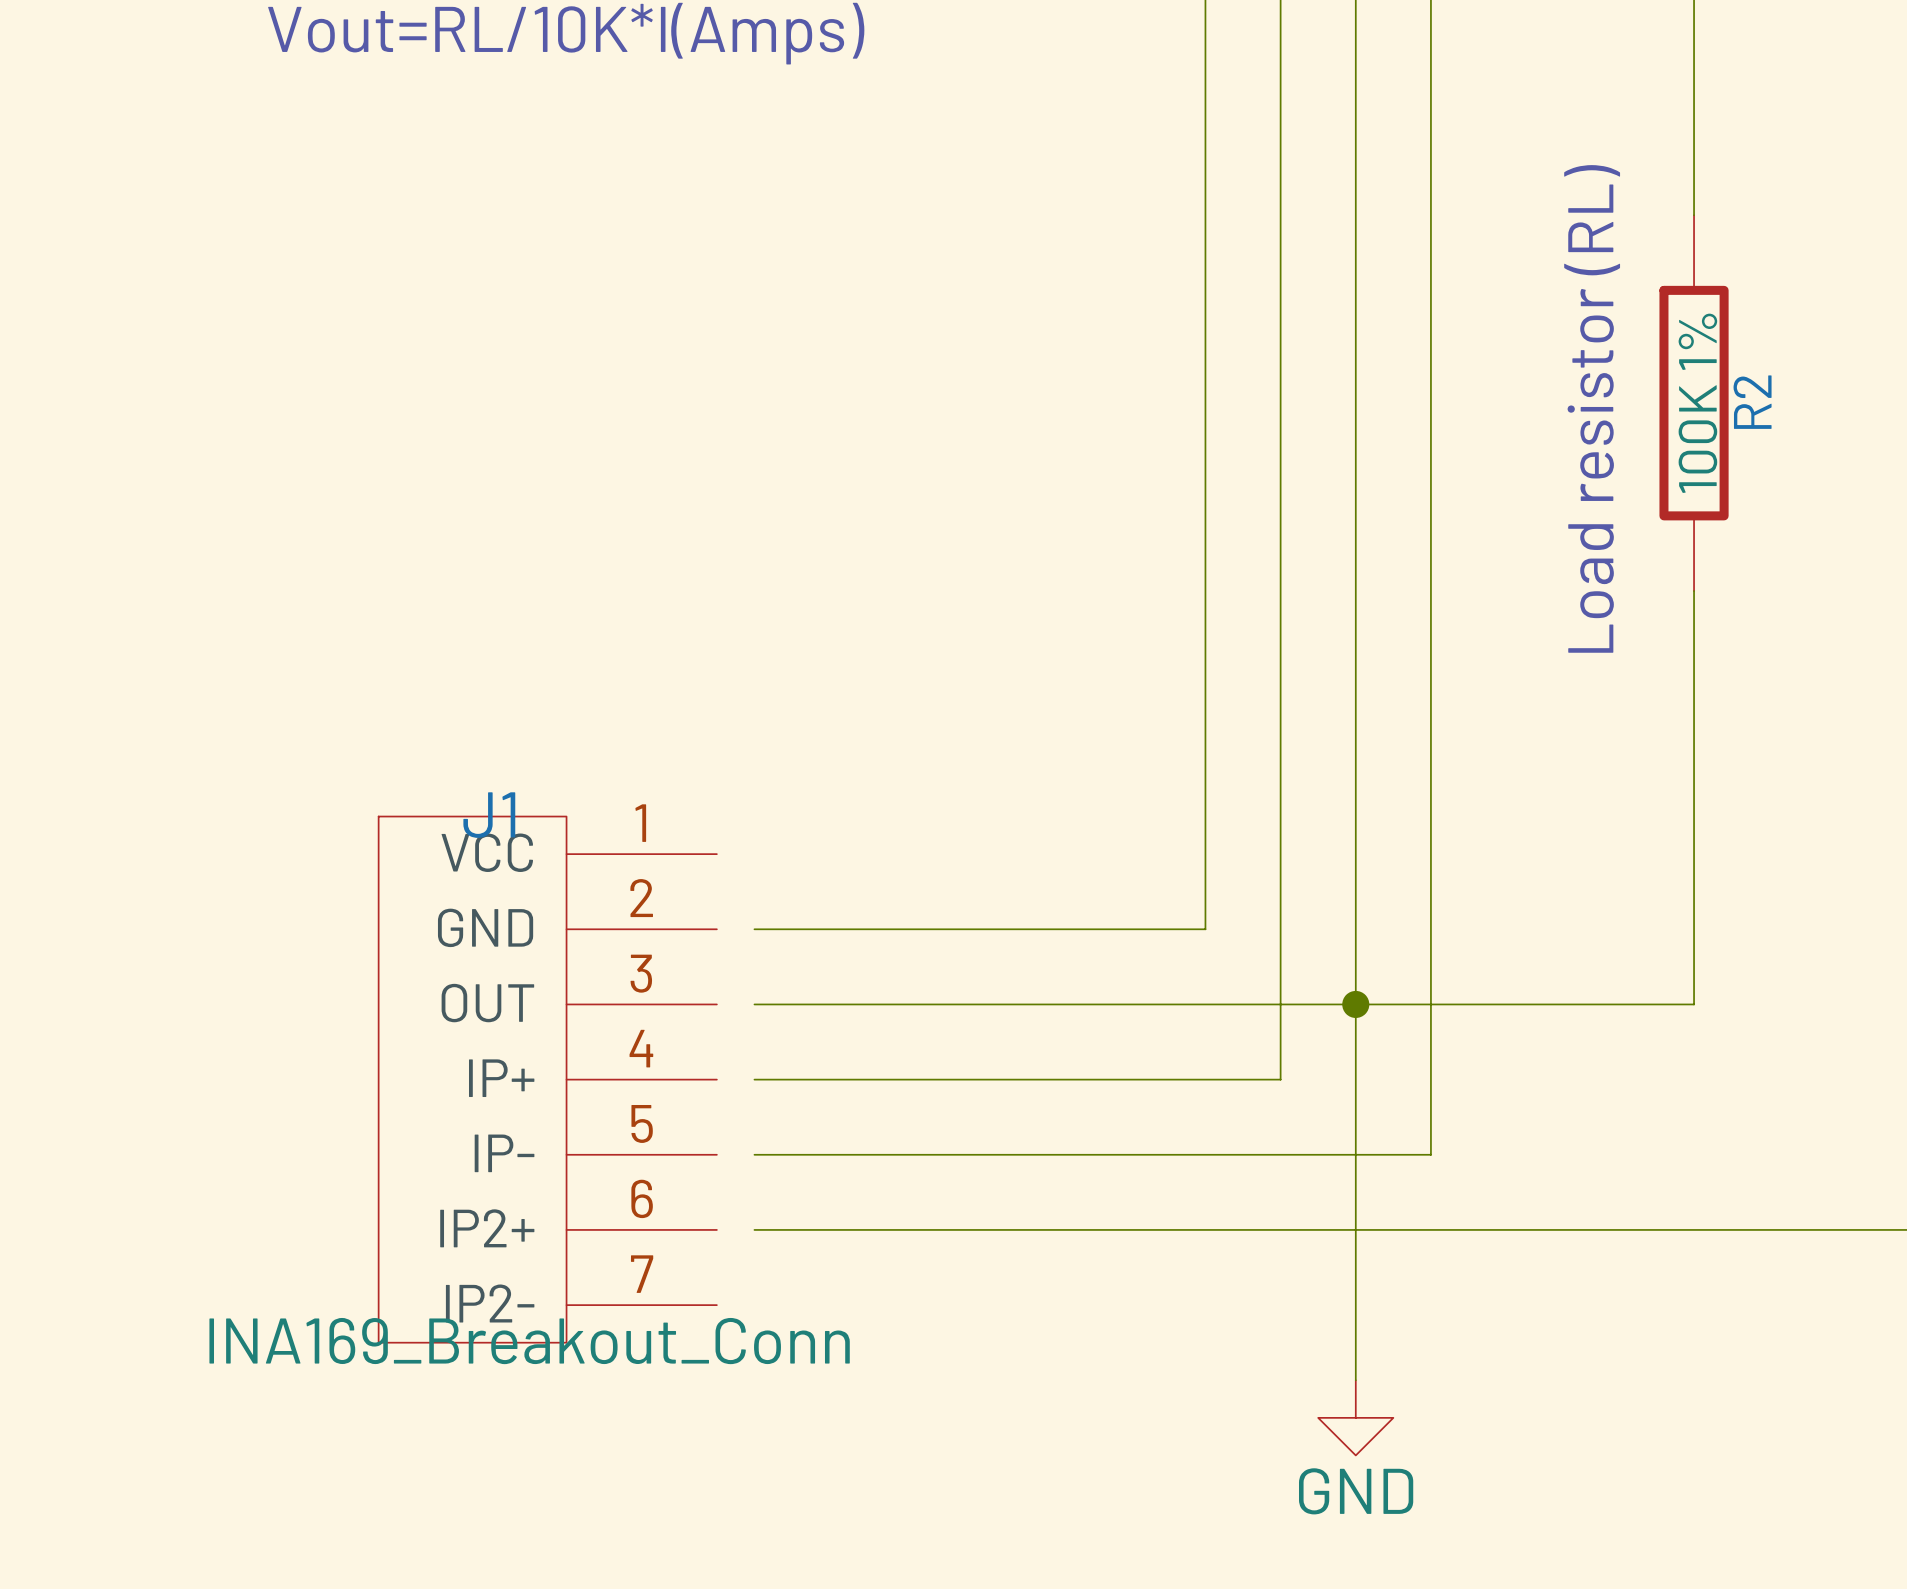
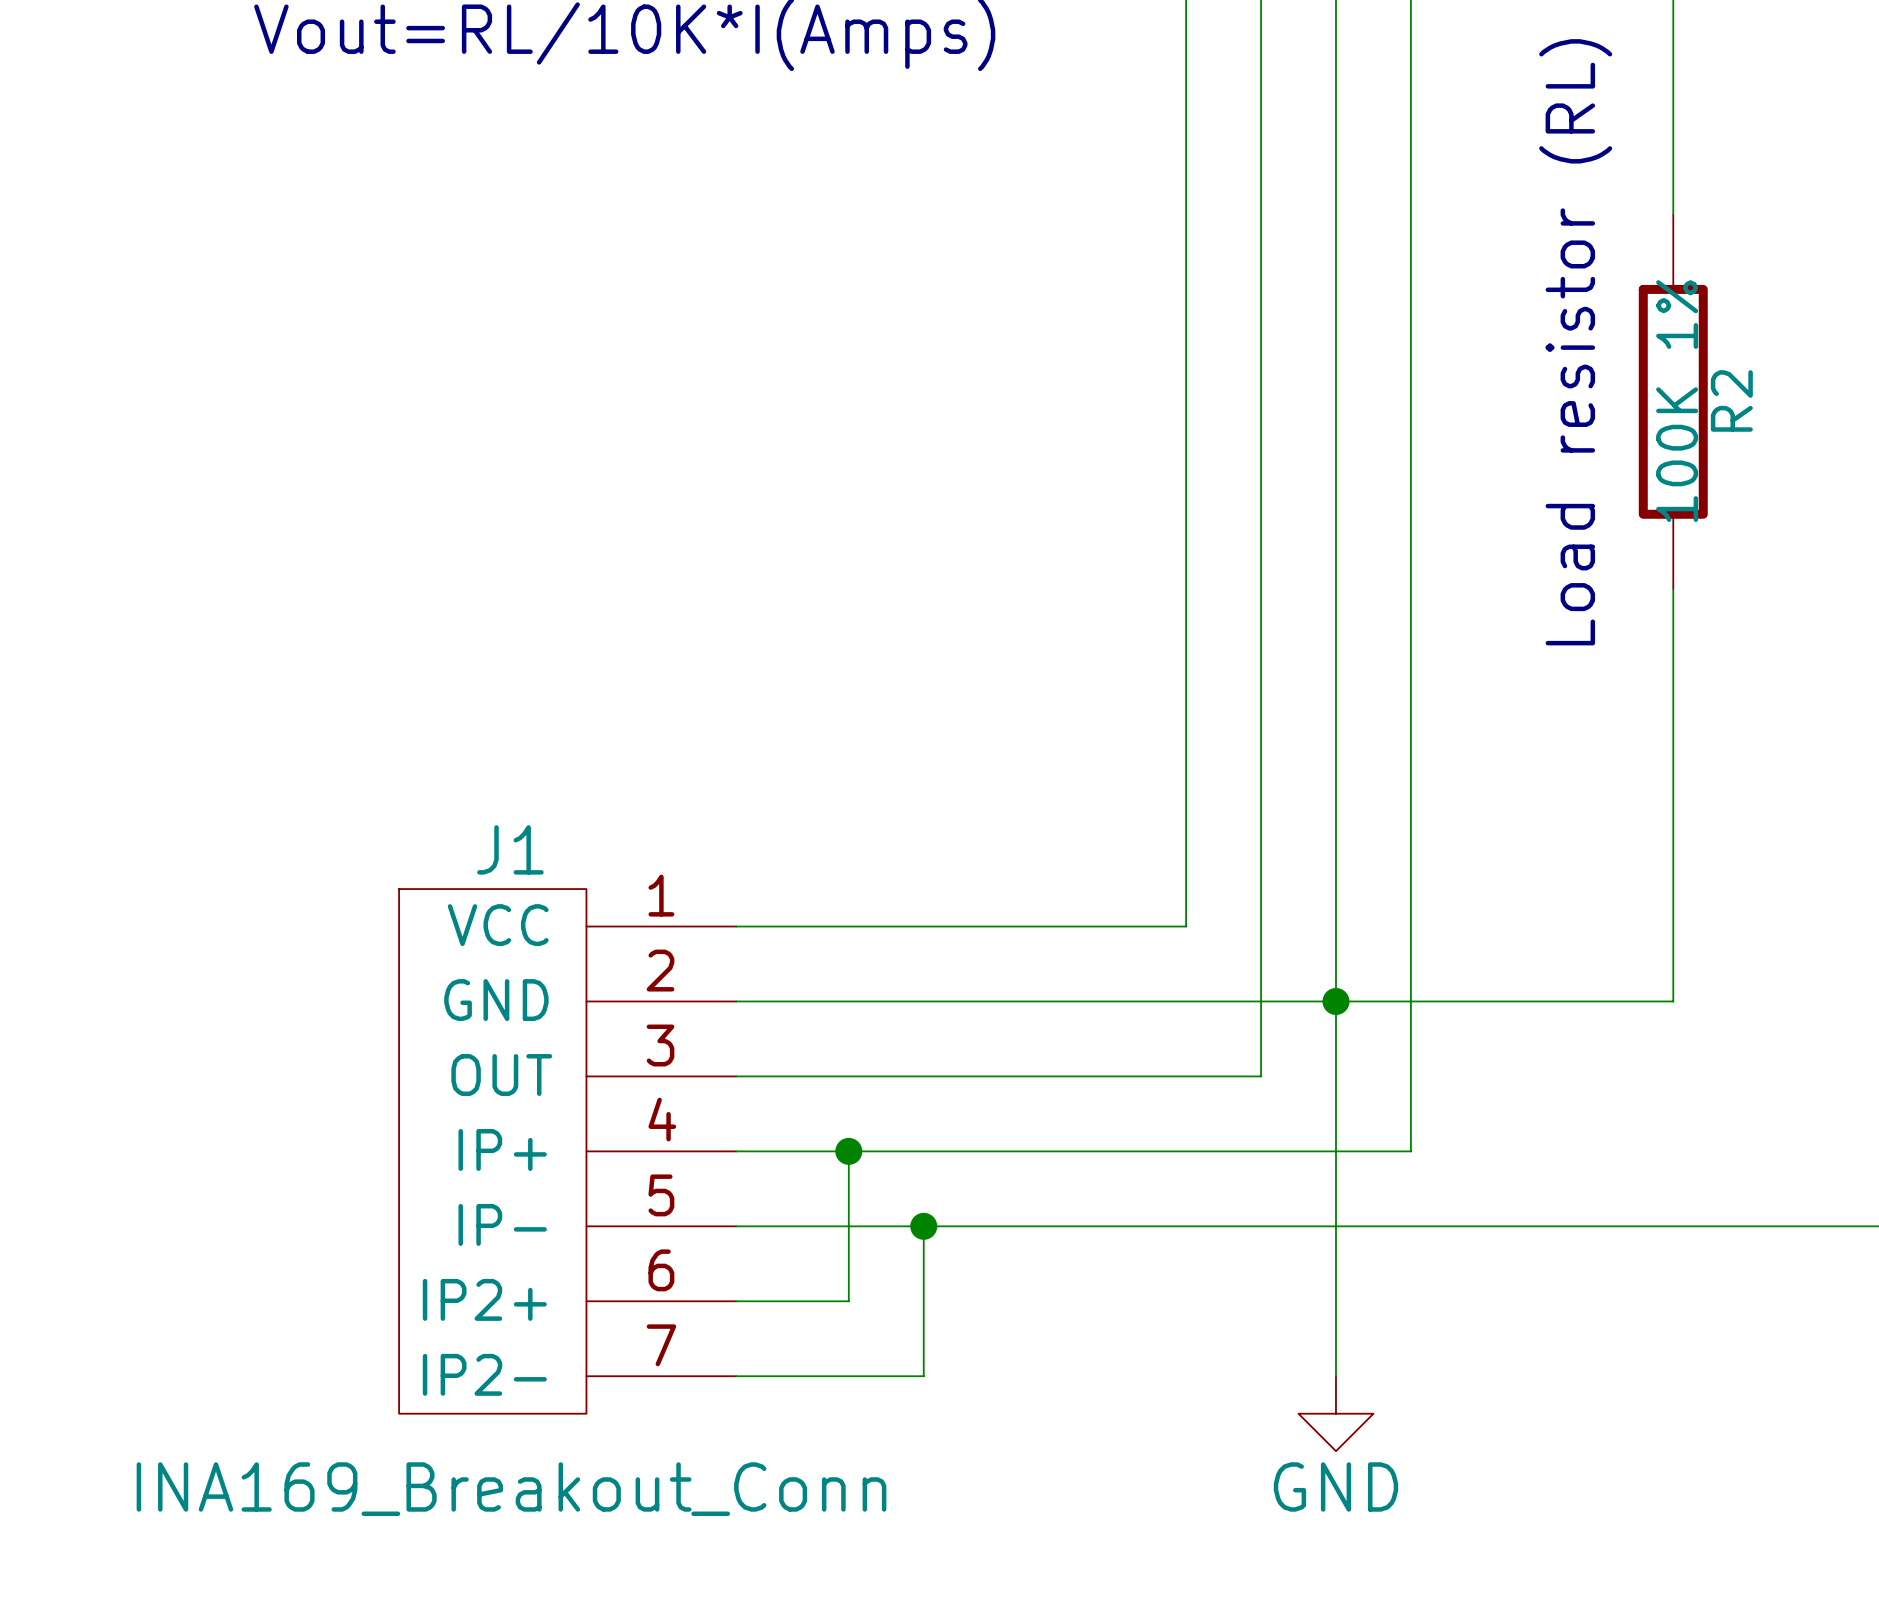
J1 name position: J1 (489, 815) -> J1 (510, 849)
J1 position: (547, 1079) -> (567, 1151)
wire: none -> (848, 1151) (848, 1301) (736, 1301)
junction: none -> (848, 1151)
wire: none -> (923, 1226) (923, 1376) (736, 1376)
junction: none -> (923, 1226)
J1 value position: INA169_Breakout_Conn (529, 1341) -> INA169_Breakout_Conn (511, 1489)

